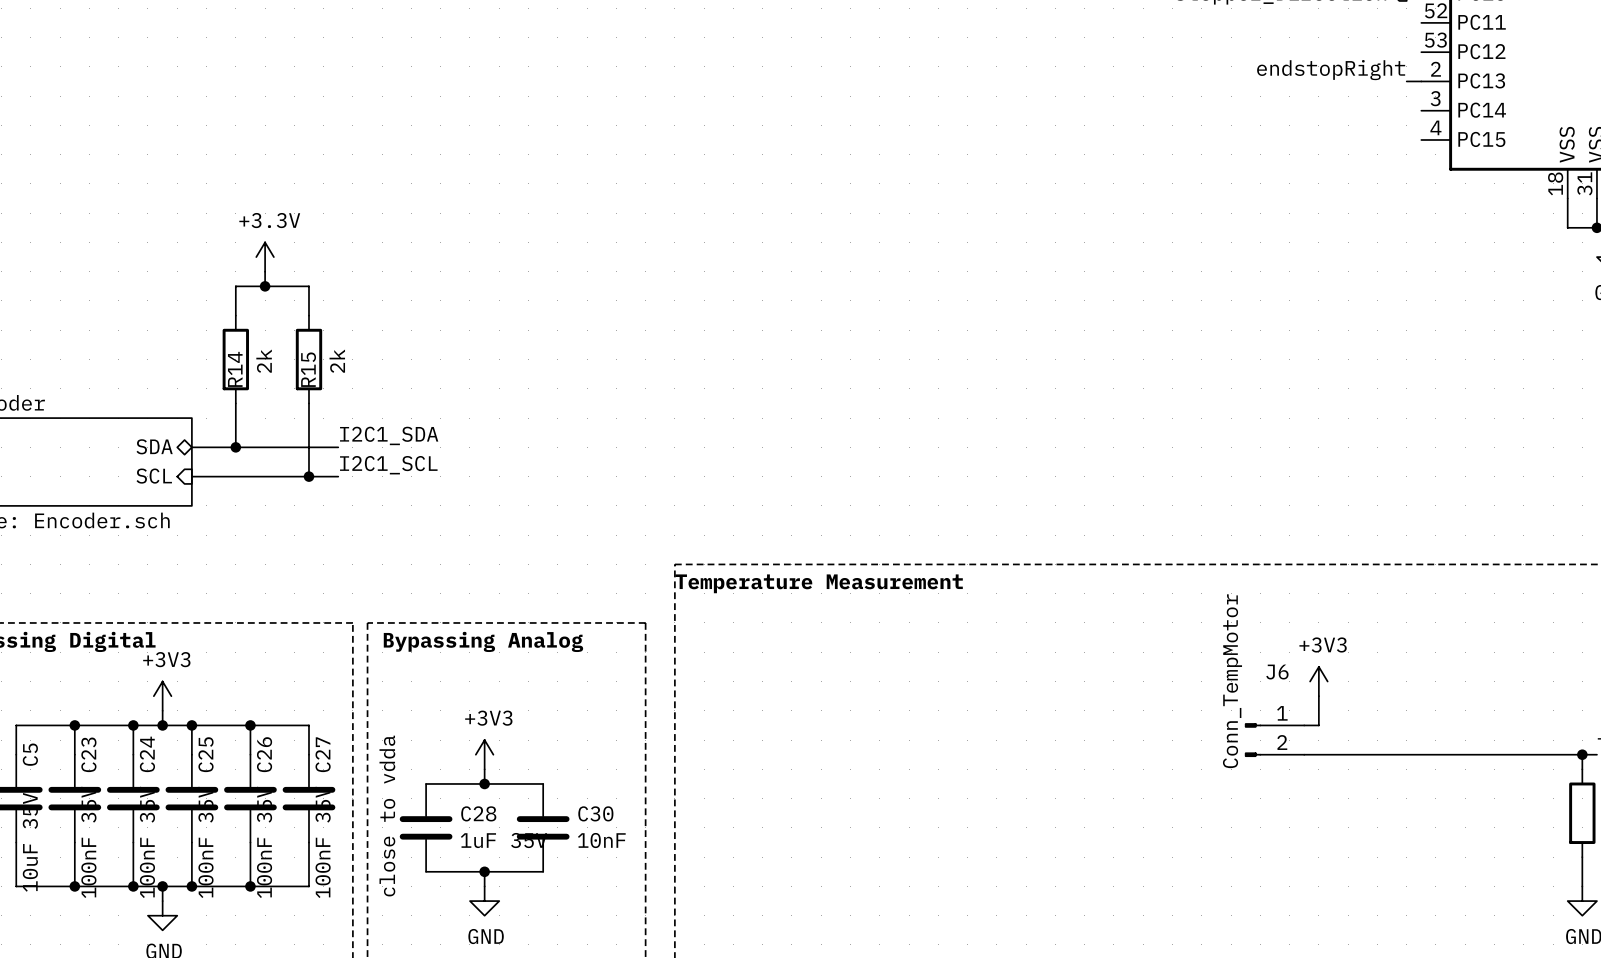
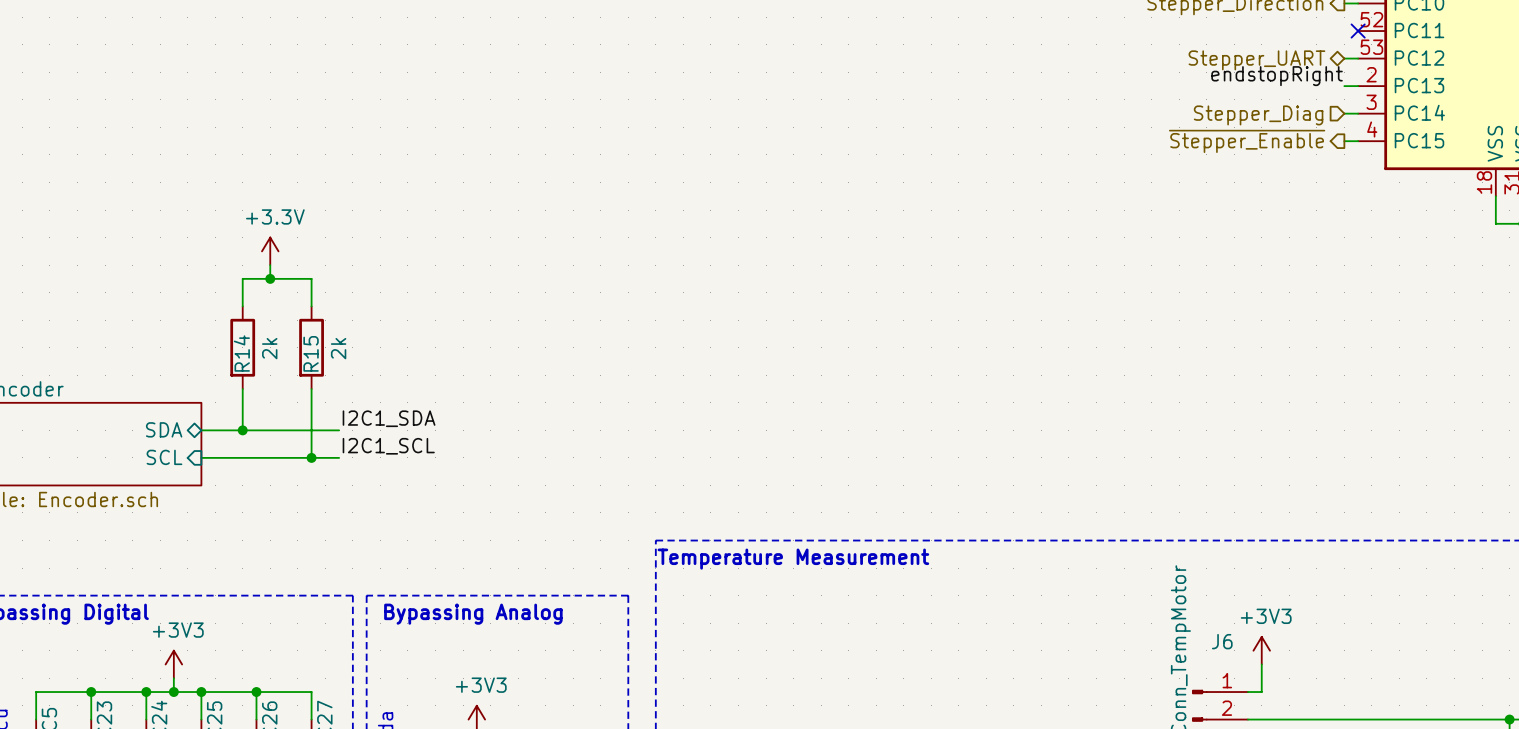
no-connect mark: none -> (1358, 31)
wire: none -> (1344, 58) (1358, 58)
hierarchical label: none -> Stepper_UART (1256, 60)
wire: none -> (1344, 113) (1358, 113)
hierarchical label: none -> Stepper_Diag (1258, 115)
hierarchical label: none -> ~{Stepper_Enable} (1247, 141)
wire: none -> (1344, 141) (1358, 141)

